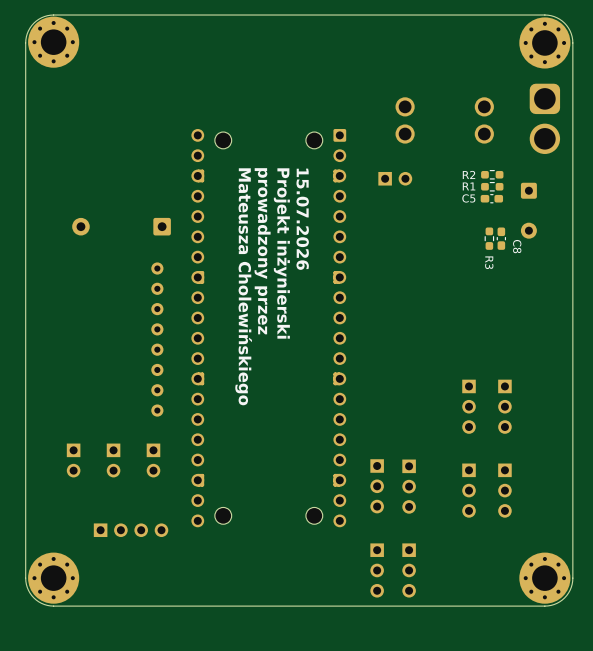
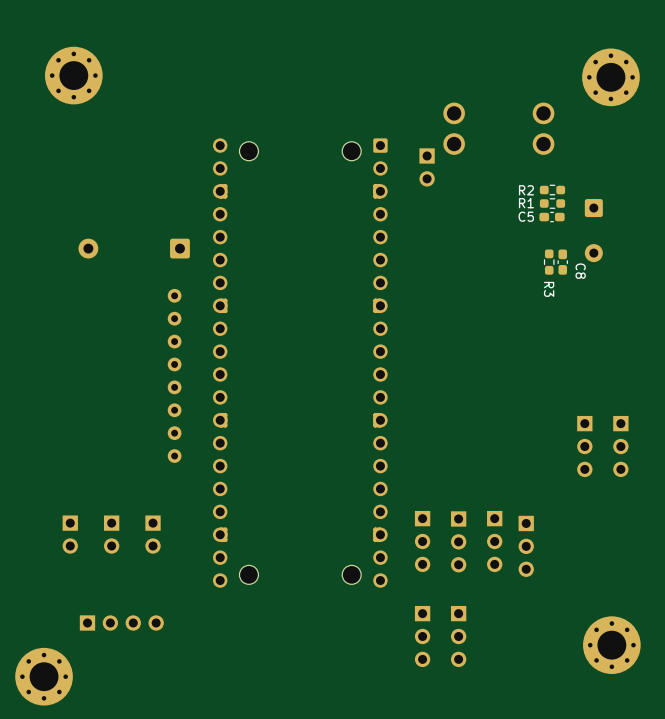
board edge: (544, 15) (53, 15) (41, 17) (31, 25) (27, 33) (25, 42) (25, 578) (28, 590) (36, 600) (44, 604) (53, 606) (544, 606) (557, 603) (566, 595) (571, 587) (572, 578) (572, 42) (571, 33) (564, 23) (557, 17) (544, 15) -> none
part position: (53, 42) -> (73, 75)
part position: (544, 42) -> (610, 77)
part: (544, 118) -> none
part rotation: 0° (395, 178) -> 90° clockwise (427, 167)
part position: (395, 178) -> (427, 167)
text: 15.07.2026 (302, 219) -> none
text: prowadzony przez (262, 251) -> none
text: Projekt inżynierski (281, 253) -> none
text: Mateusza Cholewińskiego (243, 286) -> none
part: none -> (620, 446)
part: (469, 406) -> none
part position: (504, 406) -> (584, 446)
part: (73, 460) -> none
part: (113, 460) -> none
part: (153, 460) -> none
part: none -> (70, 534)
part: none -> (111, 534)
part: none -> (153, 534)
part: none -> (494, 541)
part: (504, 490) -> none
part position: (131, 530) -> (121, 622)
part position: (53, 578) -> (44, 676)

